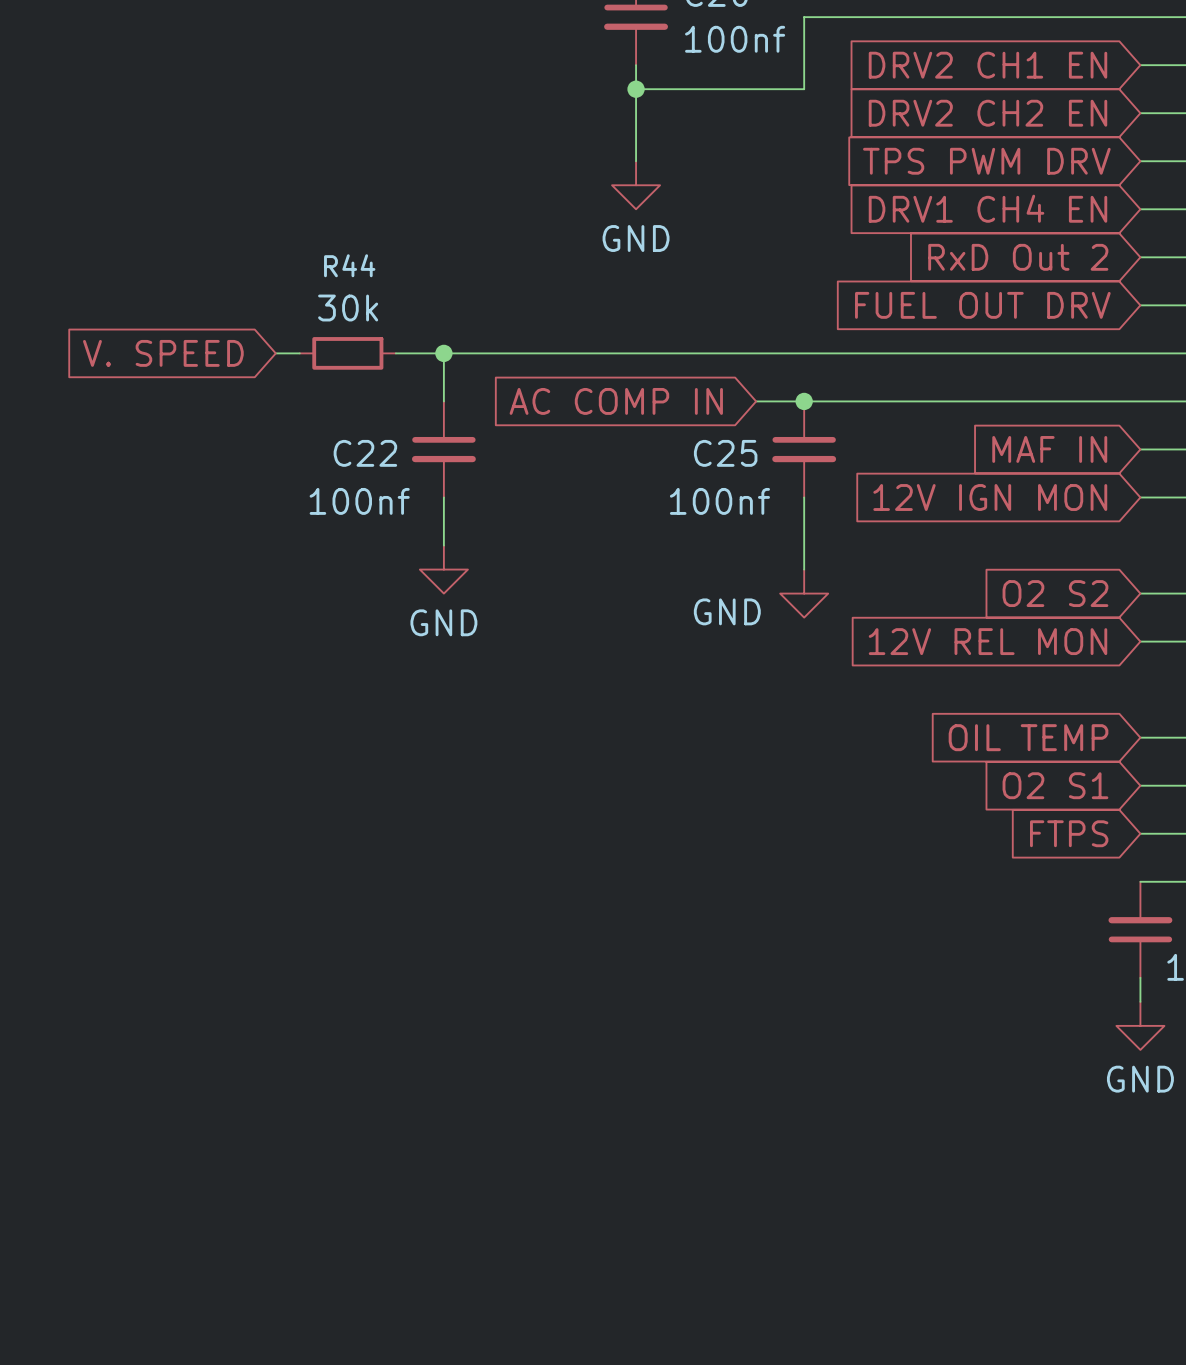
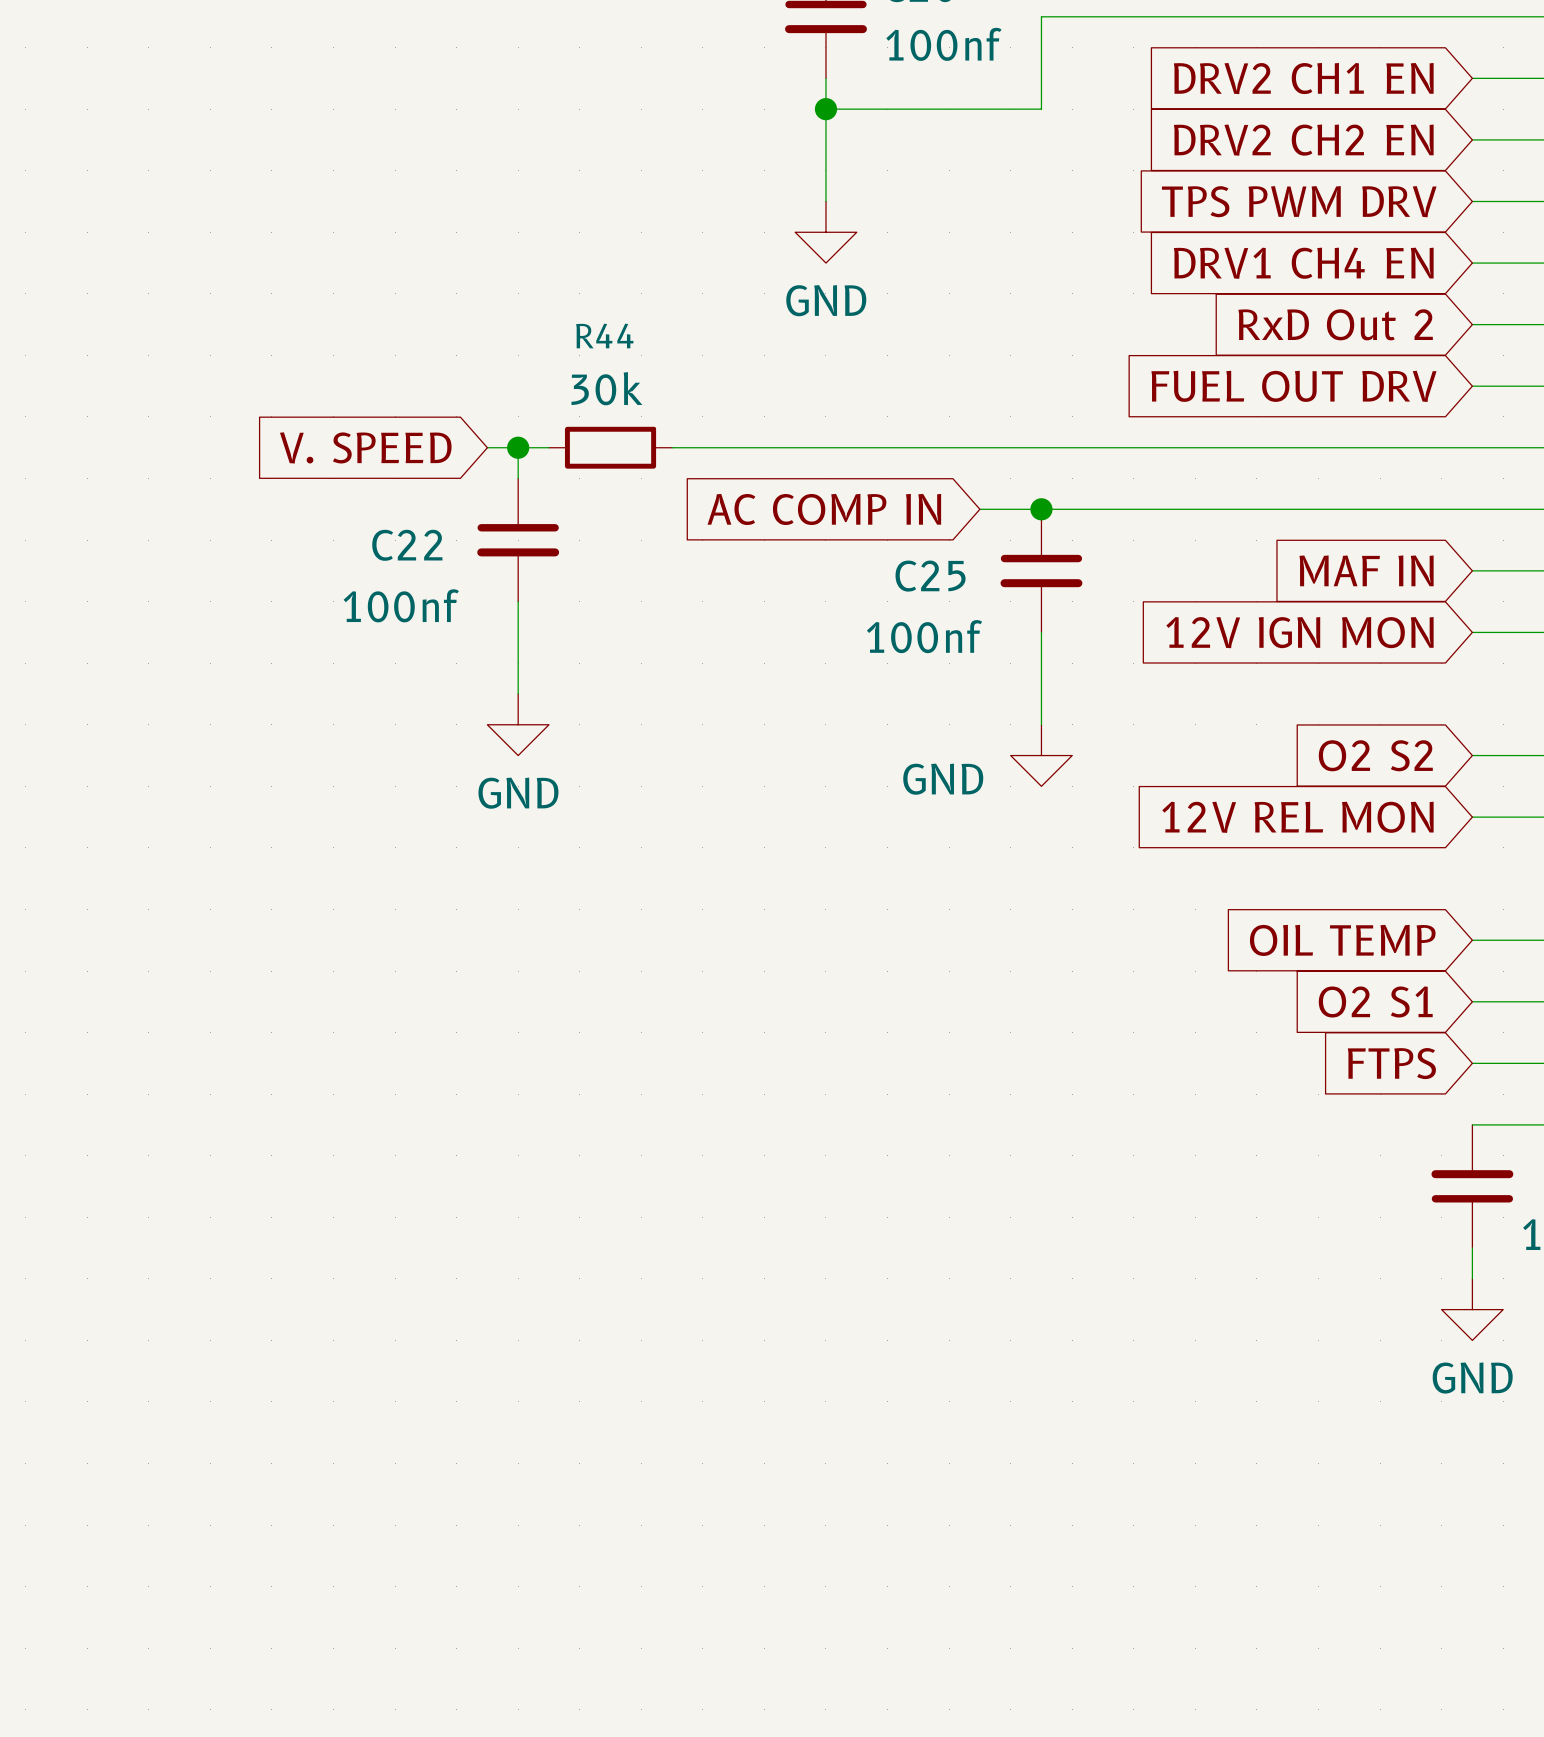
global label position: V. SPEED (163, 353) -> V. SPEED (365, 447)
wire: (275, 353) (299, 353) -> none
R44 position: (347, 353) -> (610, 447)
wire: none -> (487, 447) (518, 447) (518, 478)
wire: (419, 353) (515, 353) -> none
wire: (443, 353) (443, 401) -> none
junction position: (443, 353) -> (518, 447)
C22 position: (443, 449) -> (518, 540)
wire: none -> (518, 601) (518, 693)
wire: (443, 497) (443, 545) -> none
power symbol position: GND (443, 569) -> GND (518, 724)

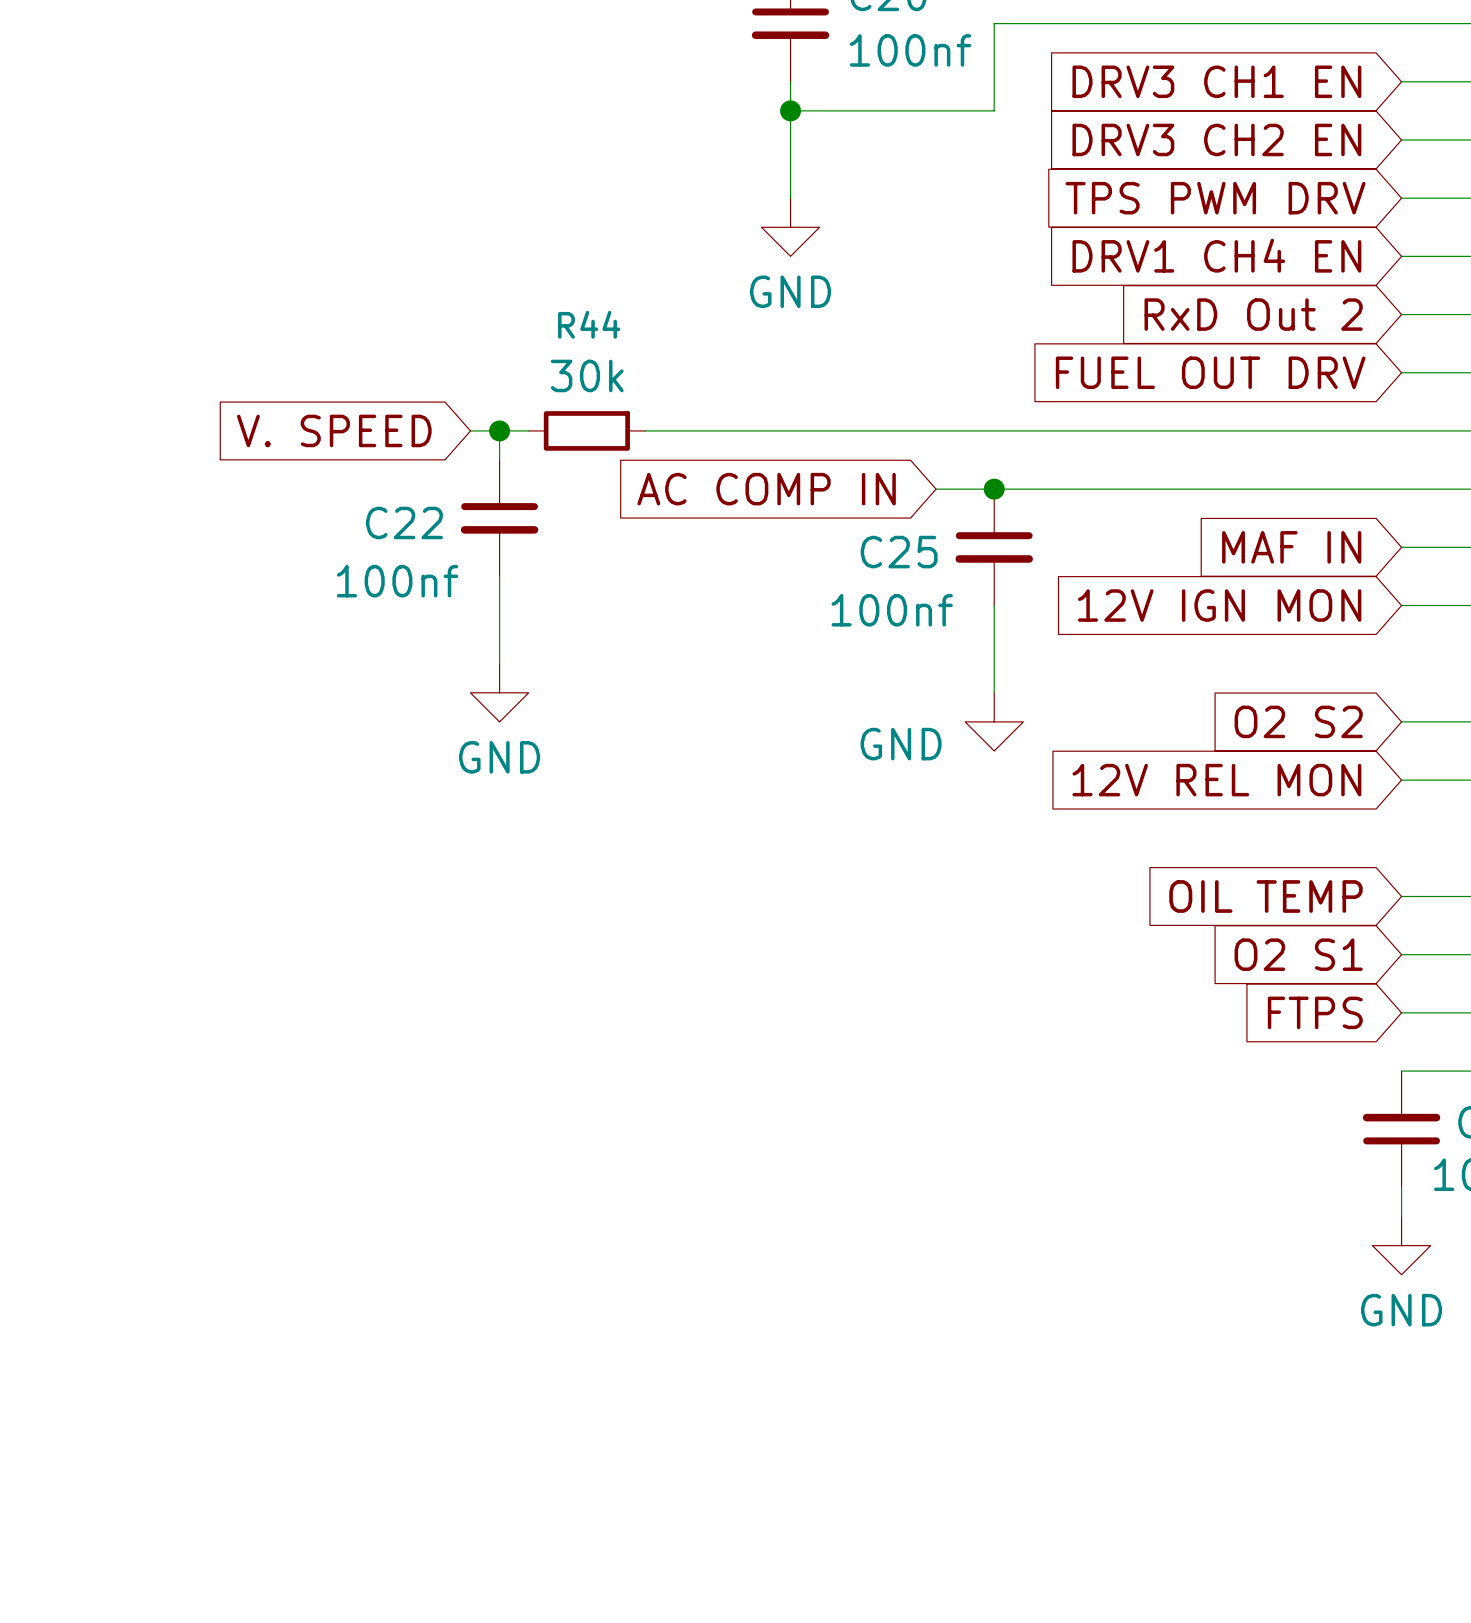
global label: DRV2 CH1 EN (1303, 78) -> DRV3 CH1 EN (1216, 81)
global label: DRV2 CH2 EN (1303, 140) -> DRV3 CH2 EN (1216, 139)

